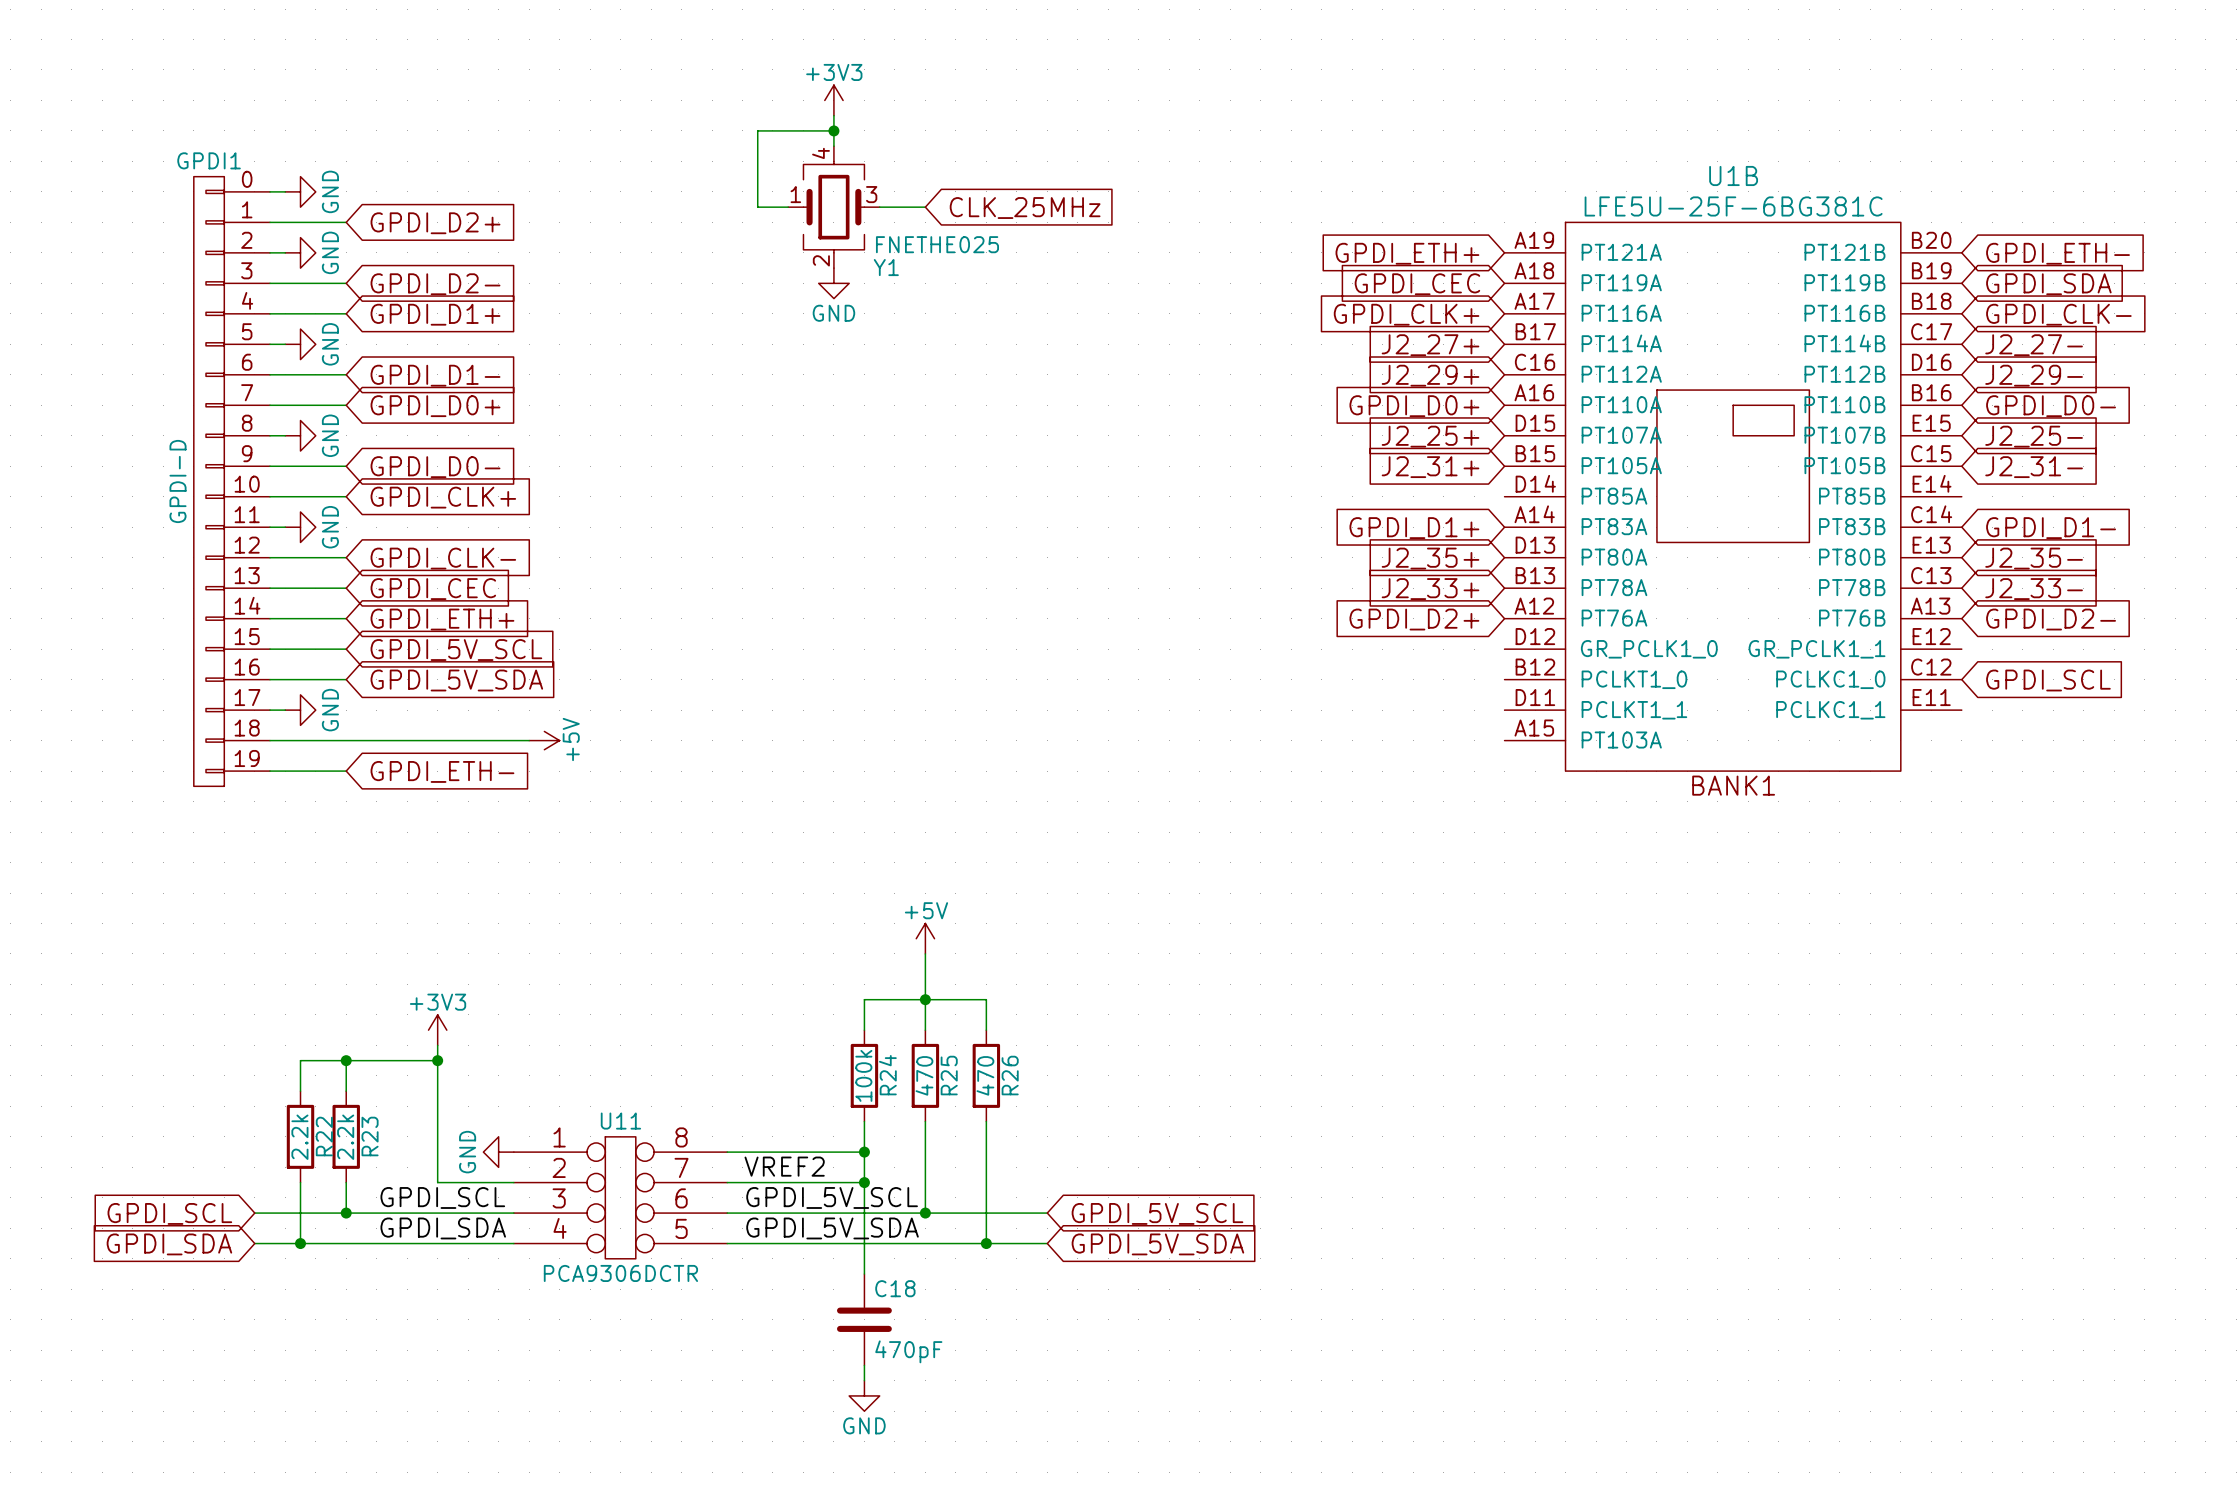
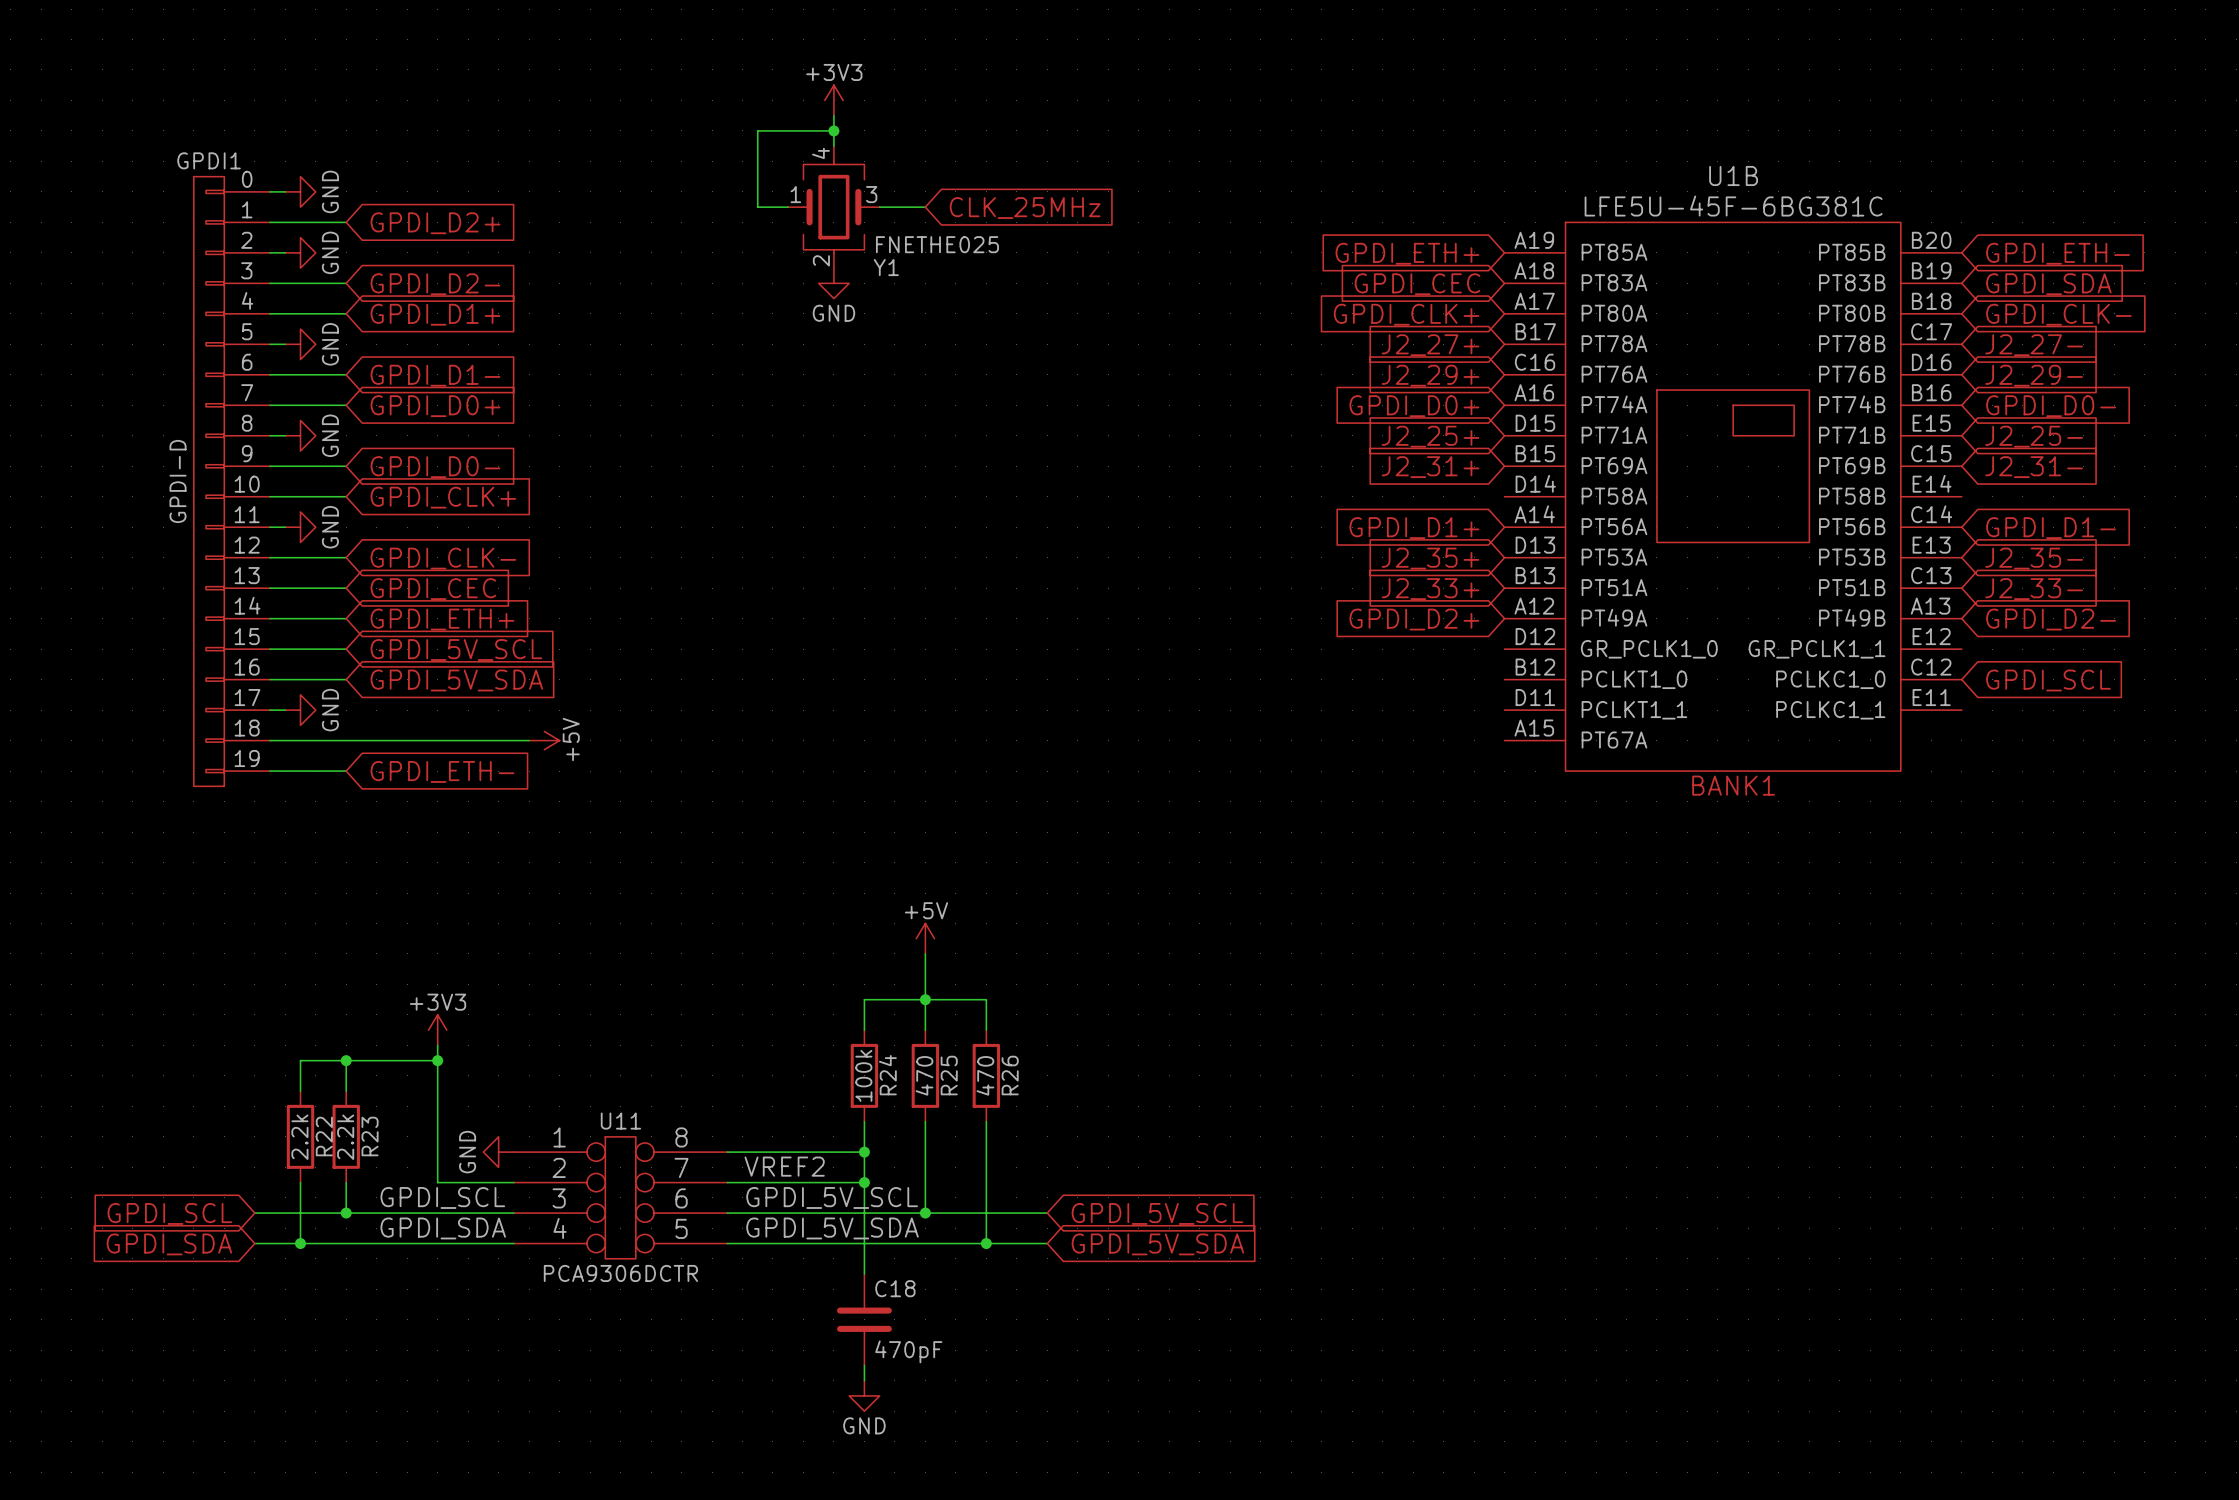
U1B value: LFE5U-25F-6BG381C (1733, 206) -> LFE5U-45F-6BG381C (1733, 206)
U1B symbol: [1504, 222, 1962, 772] -> [1504, 222, 1962, 772]

